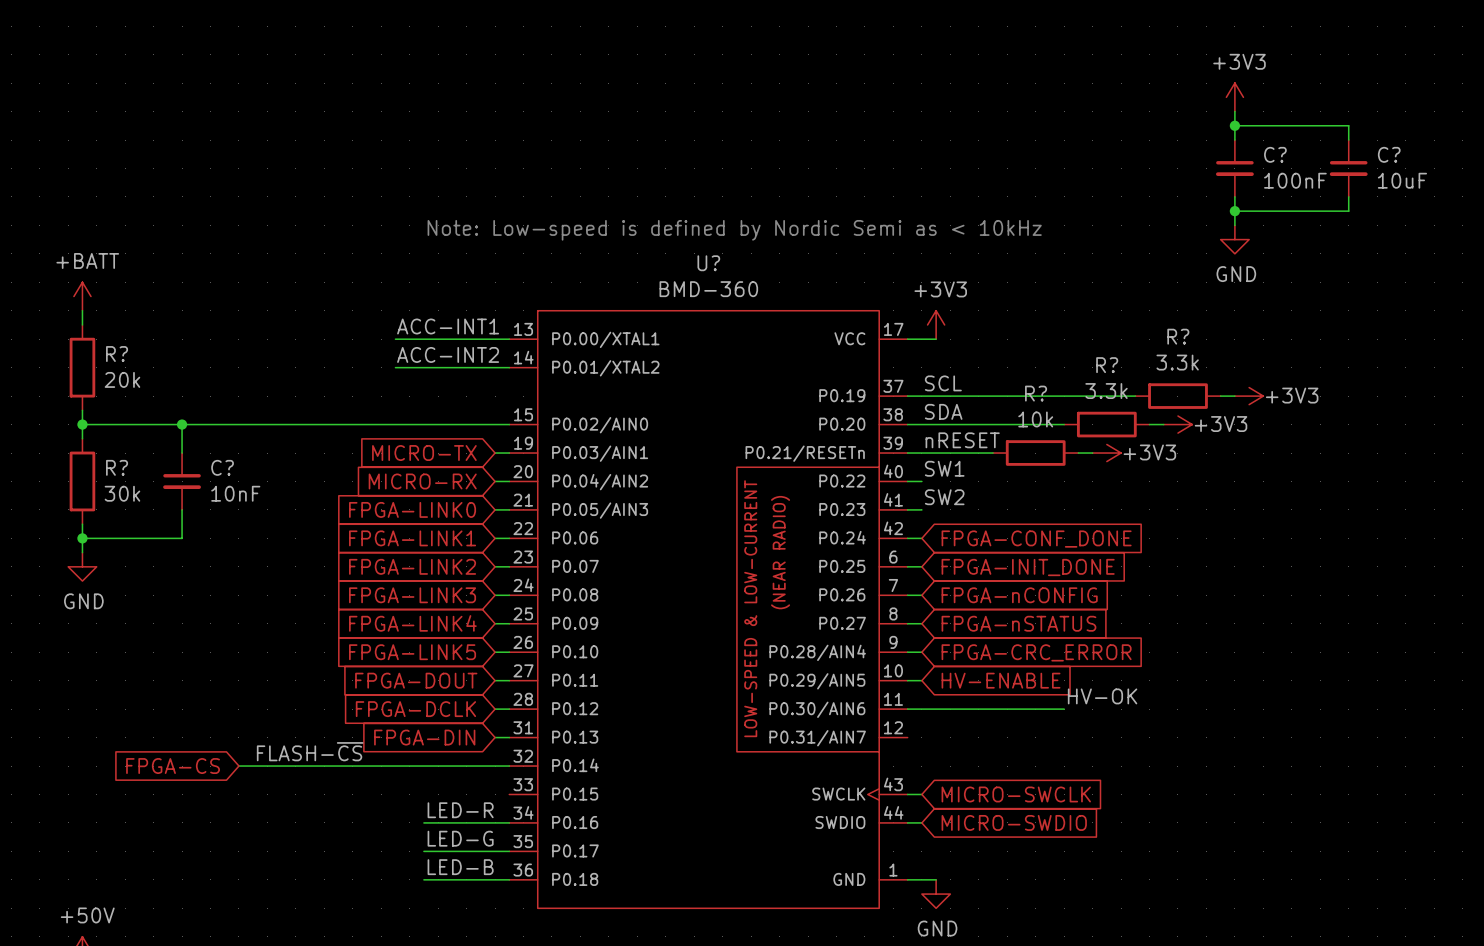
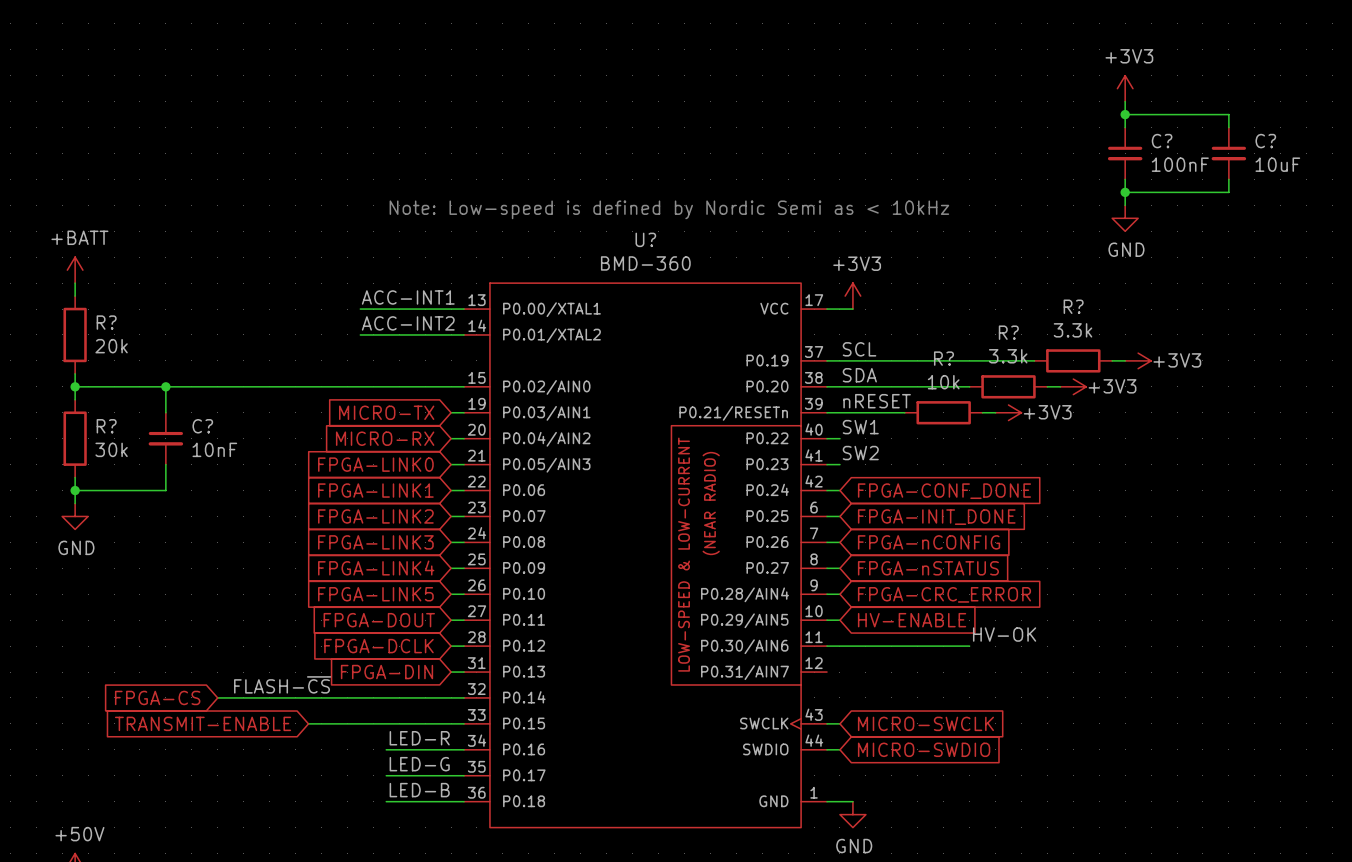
global label: none -> TRANSMIT-ENABLE (203, 723)
wire: none -> (308, 723) (464, 723)

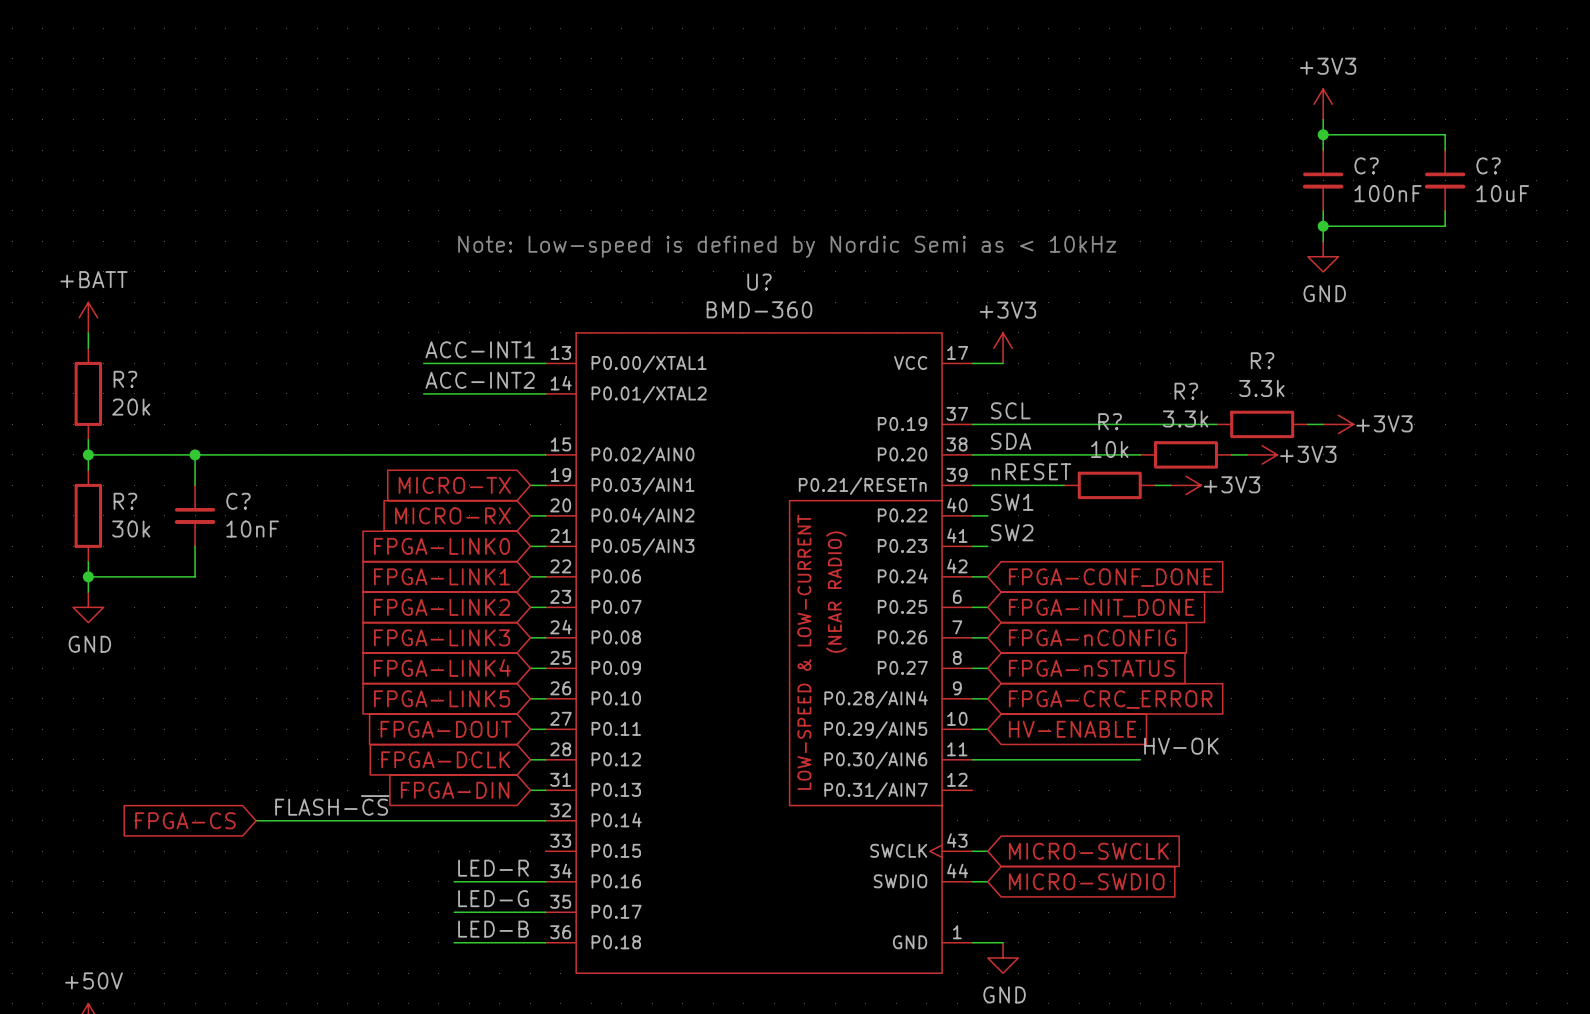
global label: TRANSMIT-ENABLE (203, 723) -> none
wire: (308, 723) (464, 723) -> none

